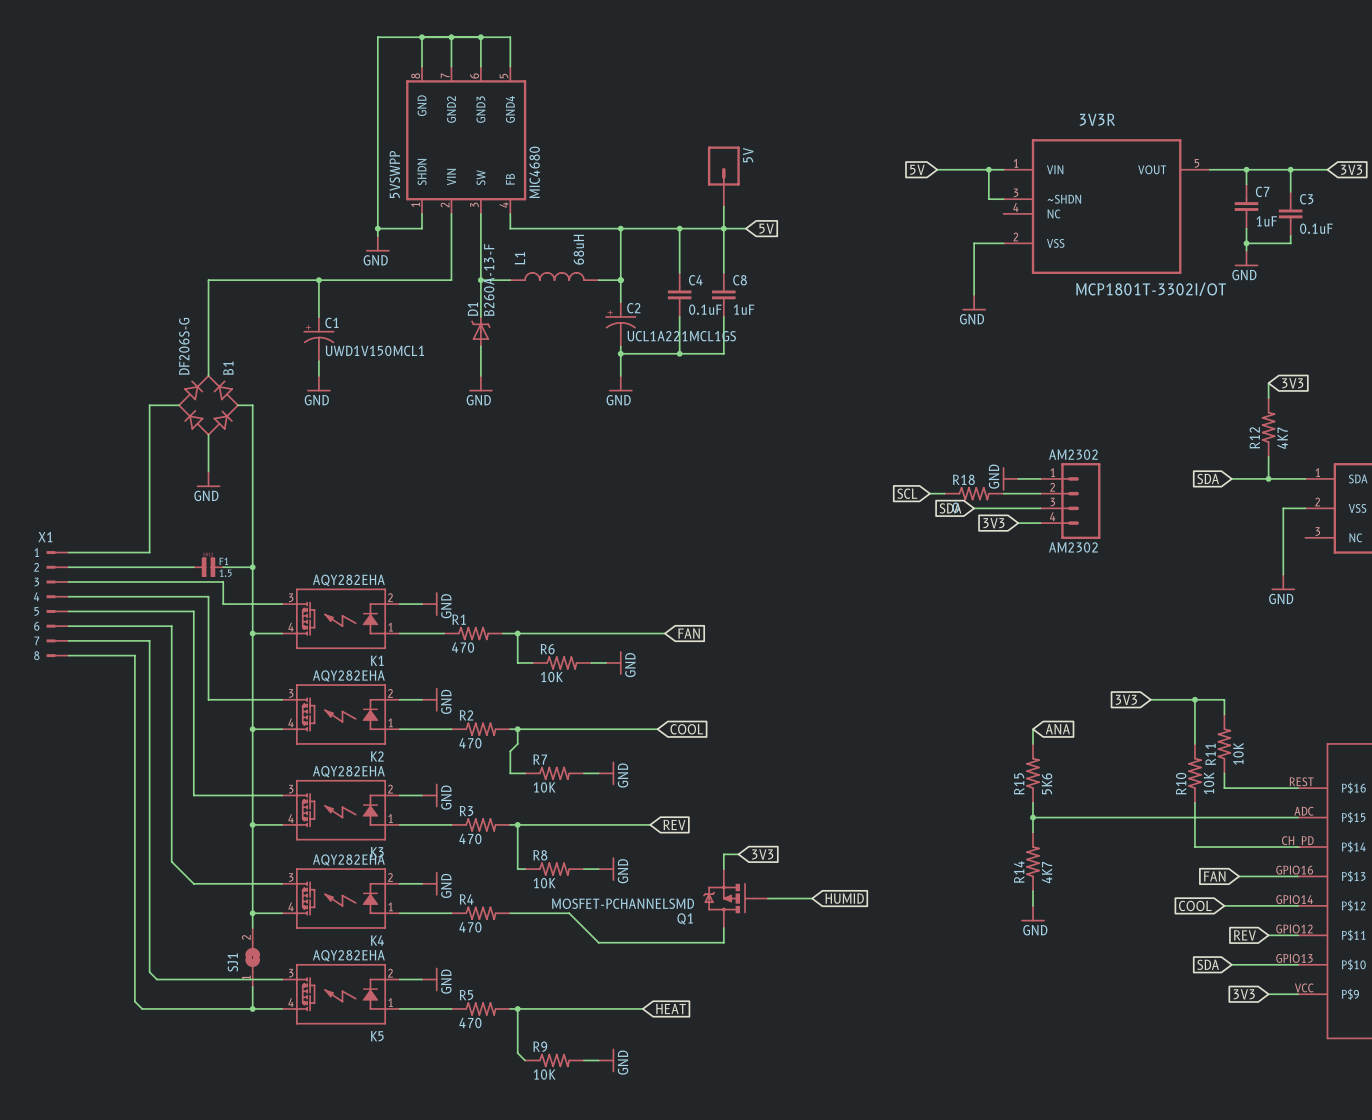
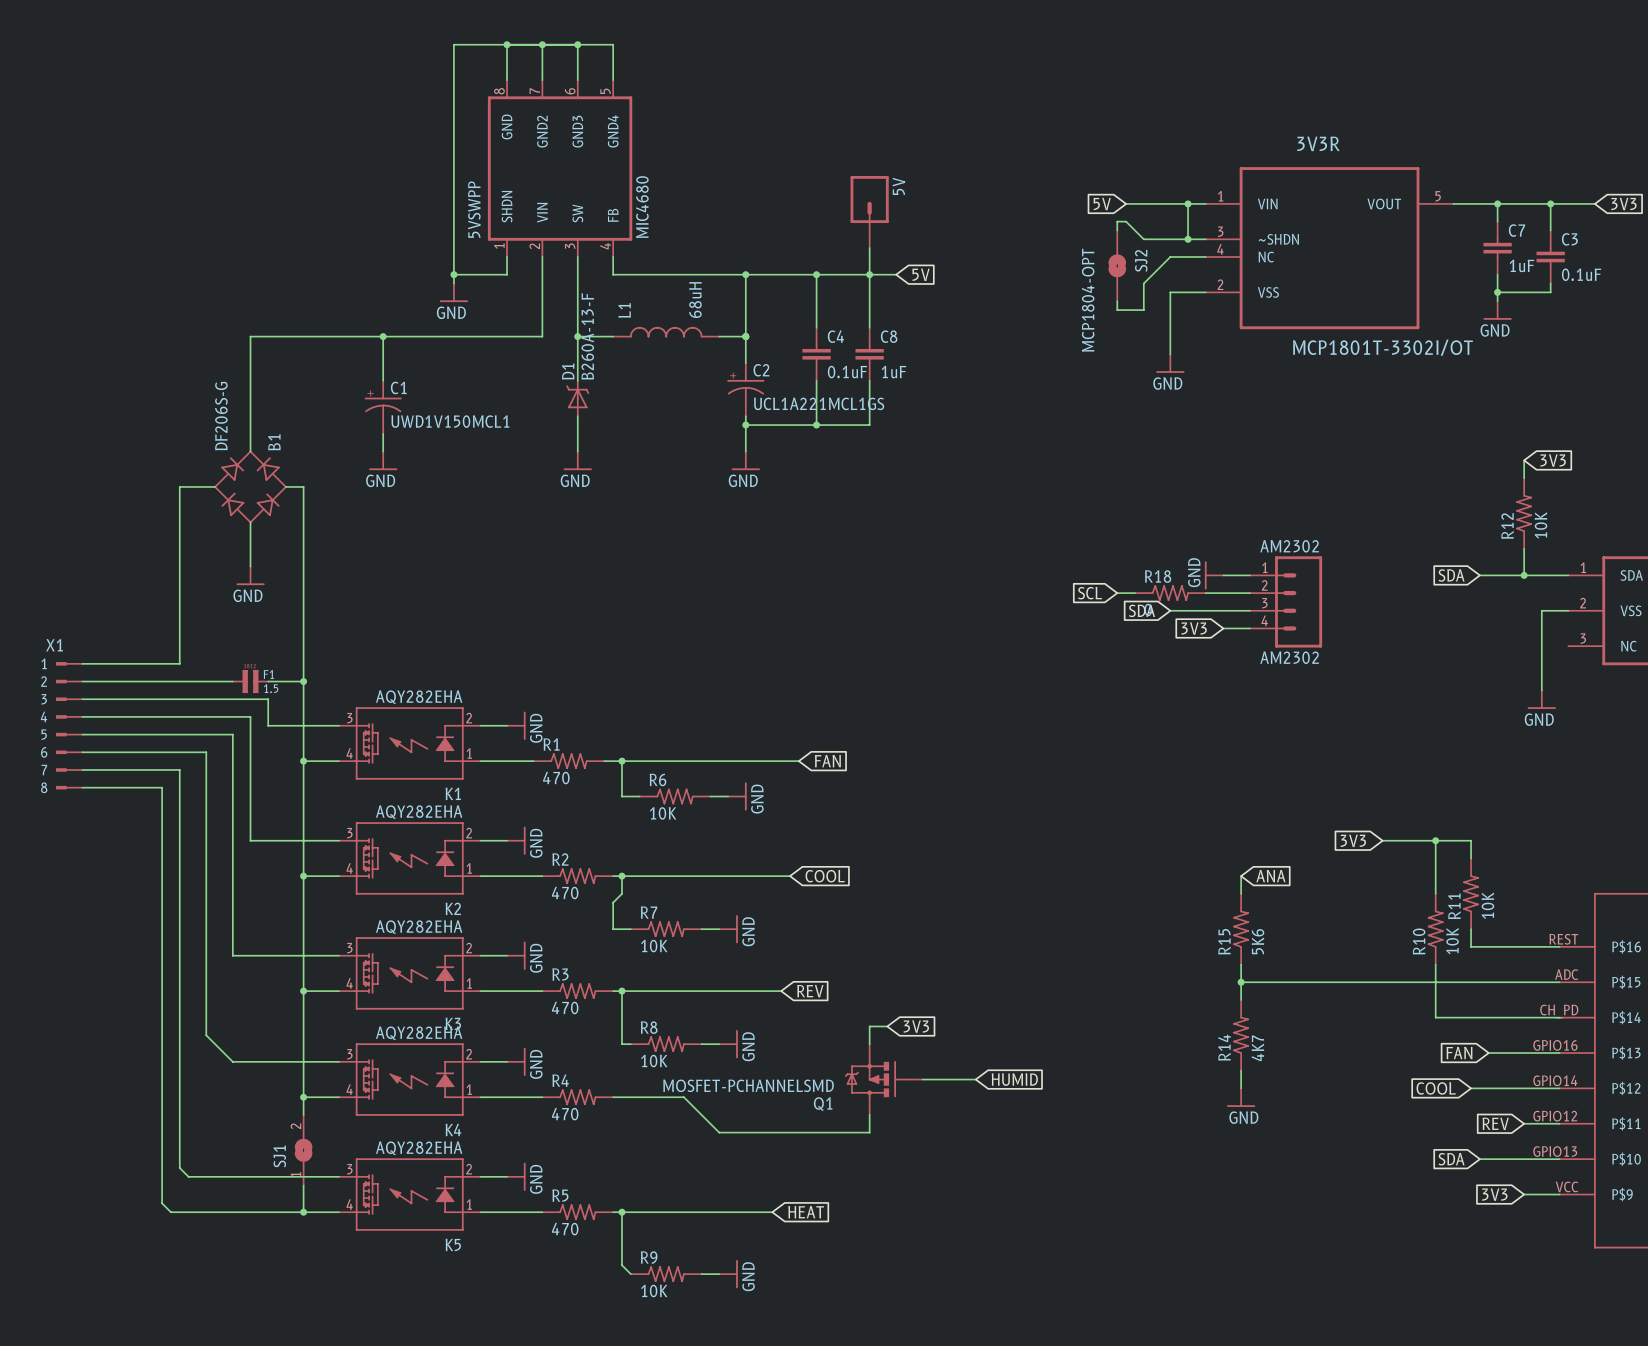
wire: none -> (1117, 230) (1117, 221) (1126, 221) (1143, 239) (1188, 239)
junction: none -> (1188, 239)
wire: none -> (1205, 257) (1170, 257) (1143, 283) (1143, 310) (1117, 310) (1117, 301)
SJ2: none -> MCP1804-OPT (1117, 265)
R12 value: 4K7 (1282, 438) -> 10K (1541, 525)

